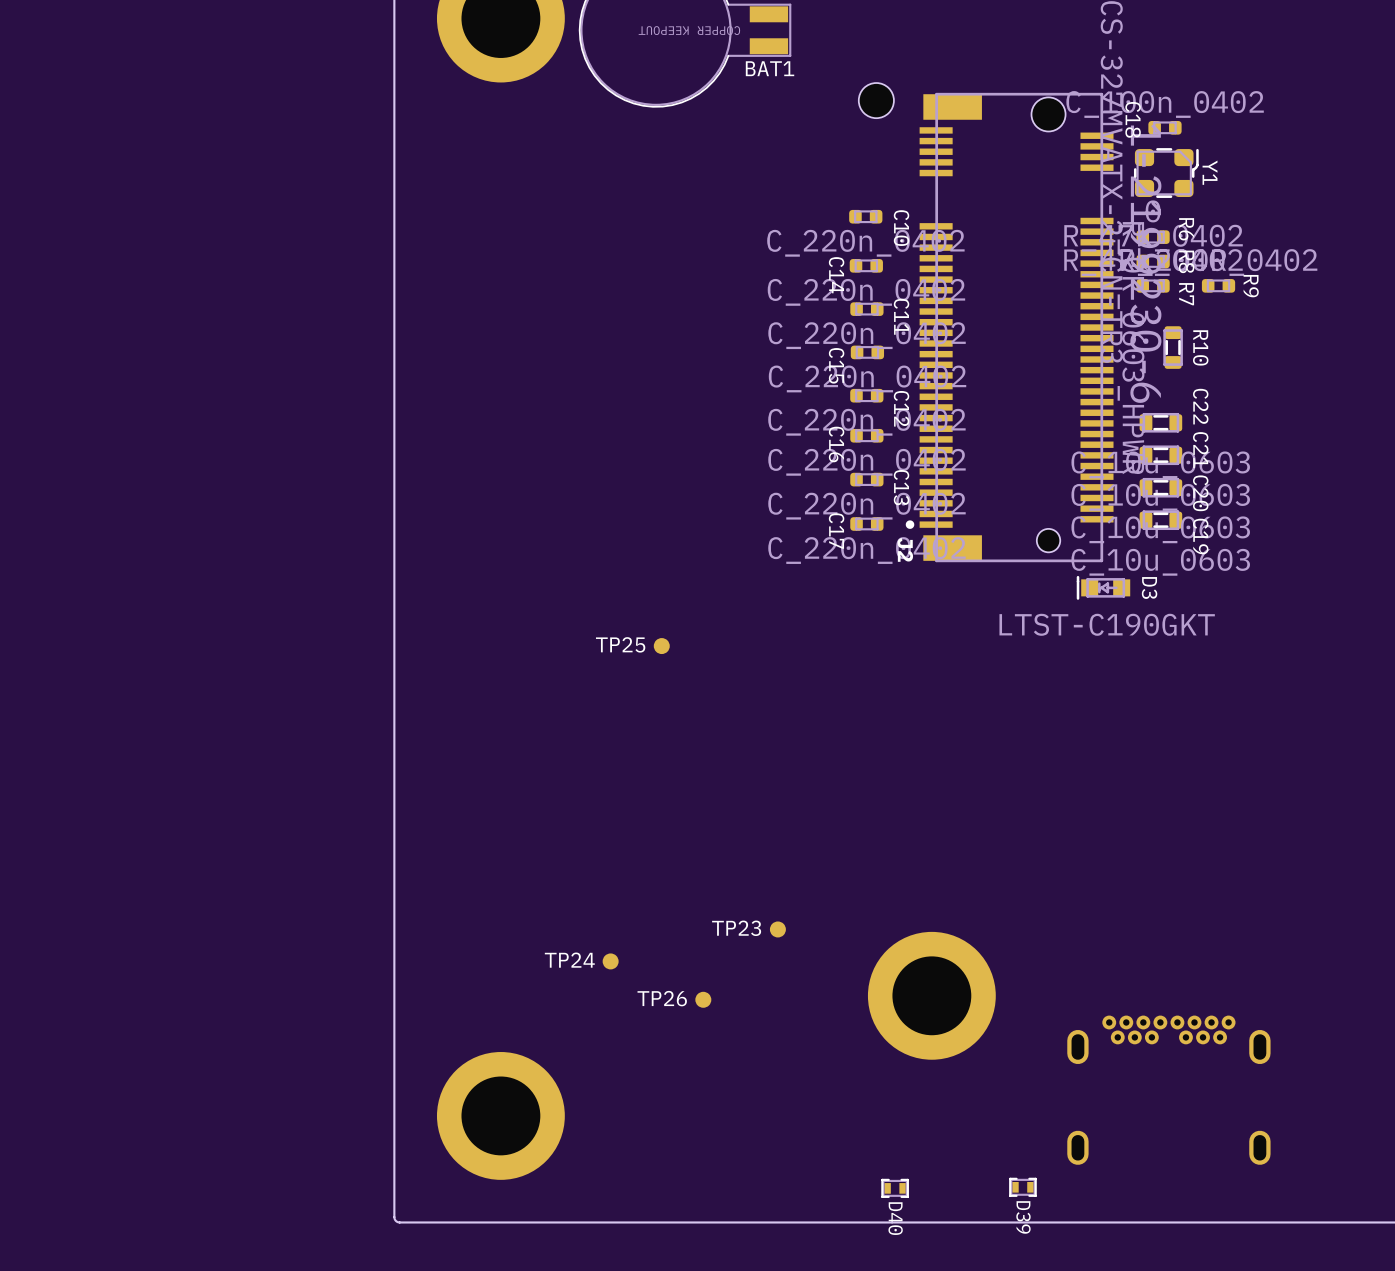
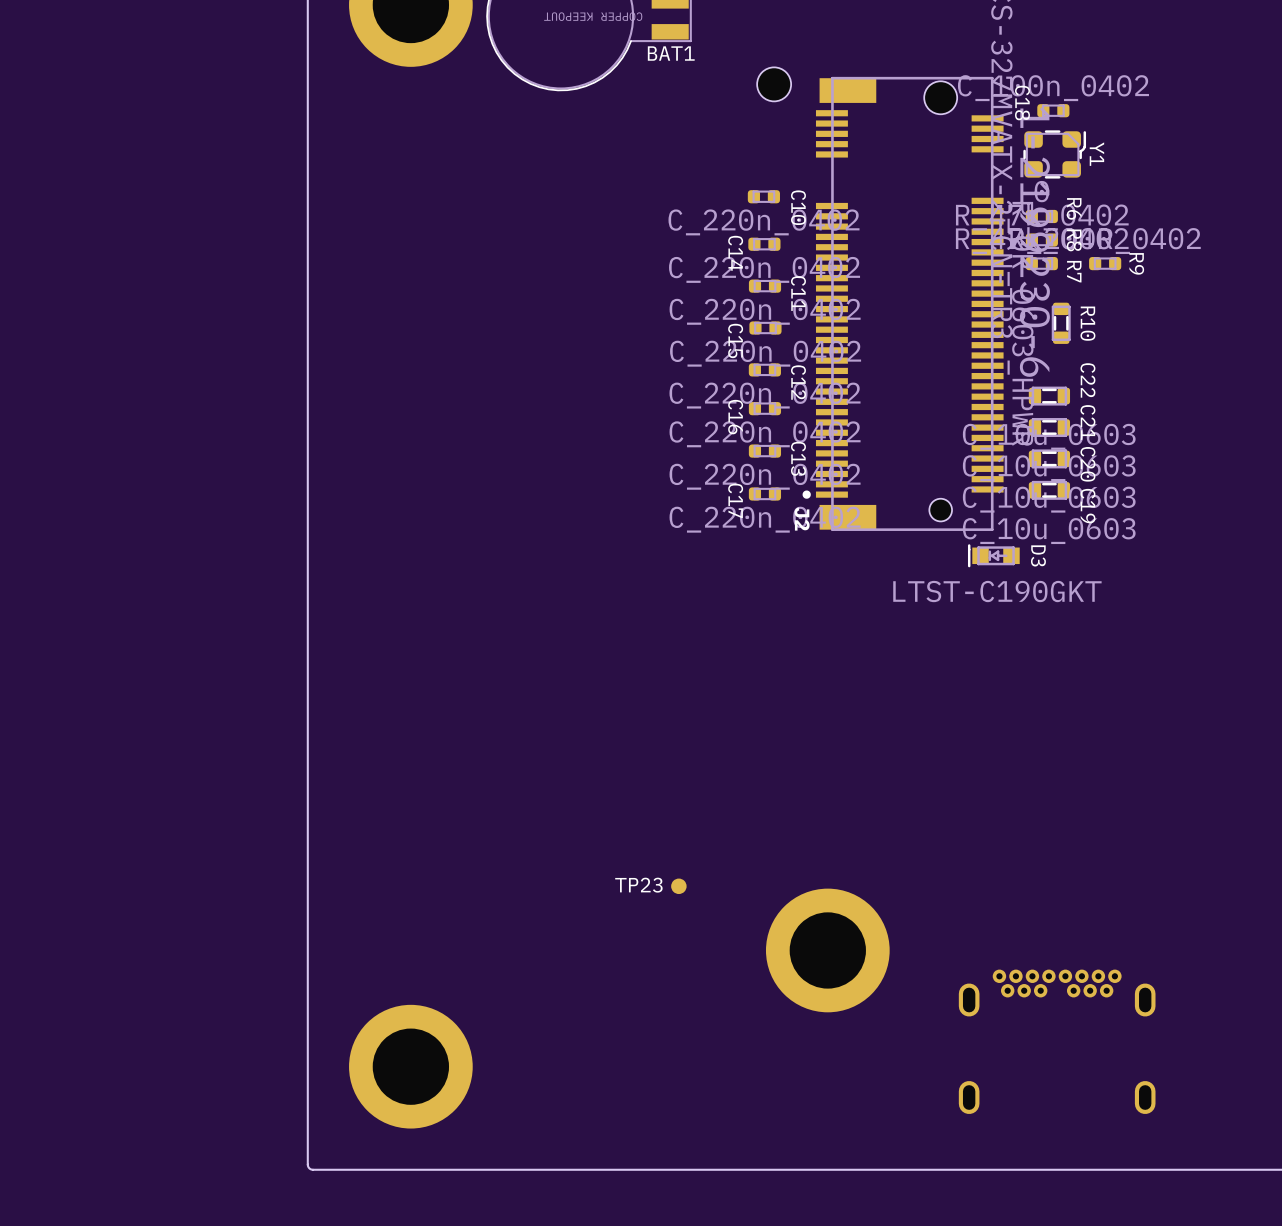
TP25: (661, 646) -> none
TP24: (610, 961) -> none
TP26: (703, 999) -> none
D39: (1022, 1187) -> none
D40: (895, 1188) -> none

